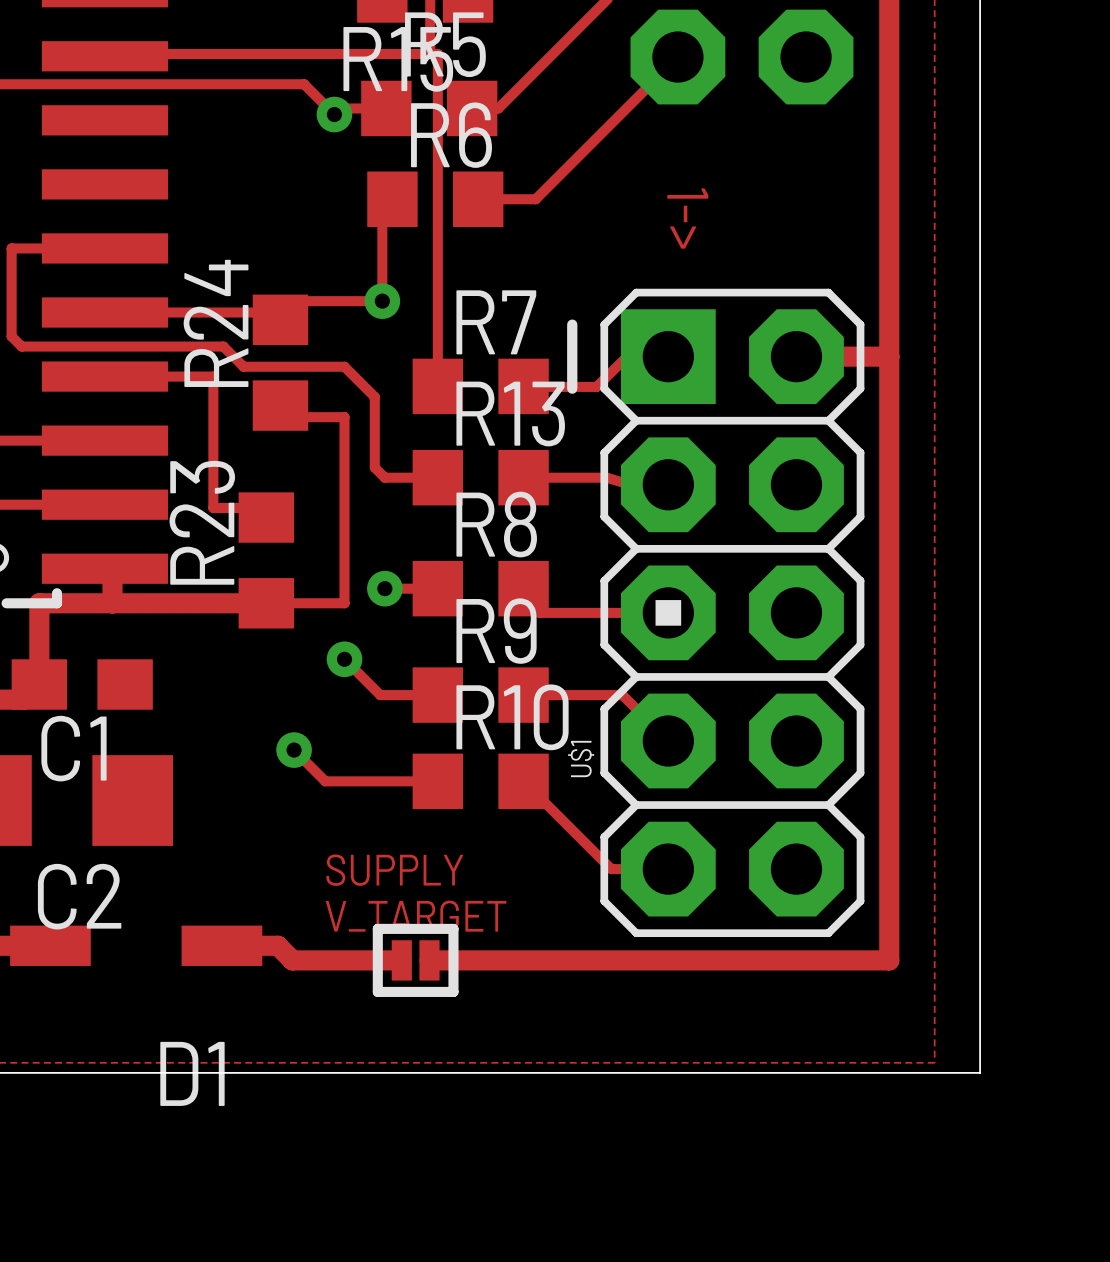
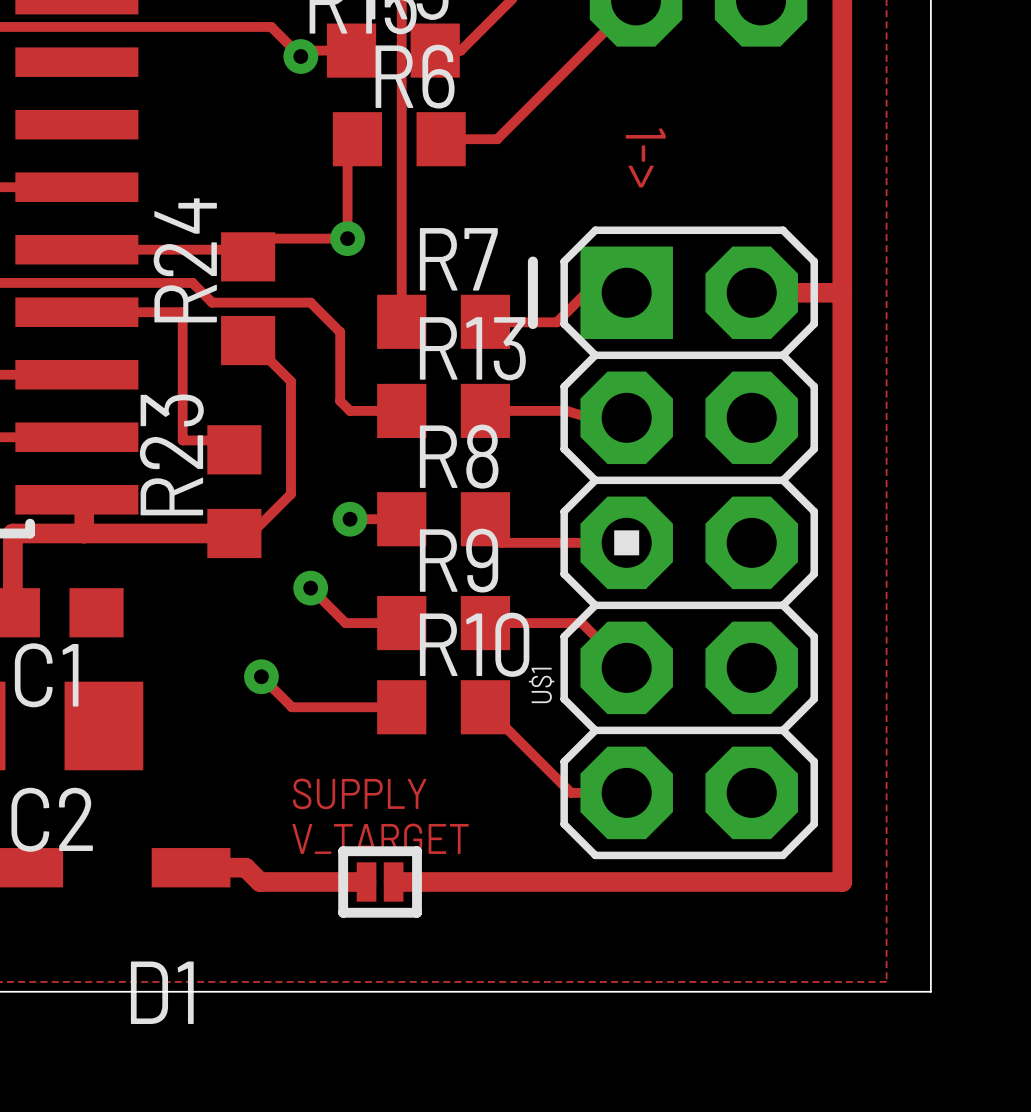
track: (280, 417) (344, 417) (344, 603) (283, 603) -> (248, 340) (290, 381) (290, 494) (251, 533)

